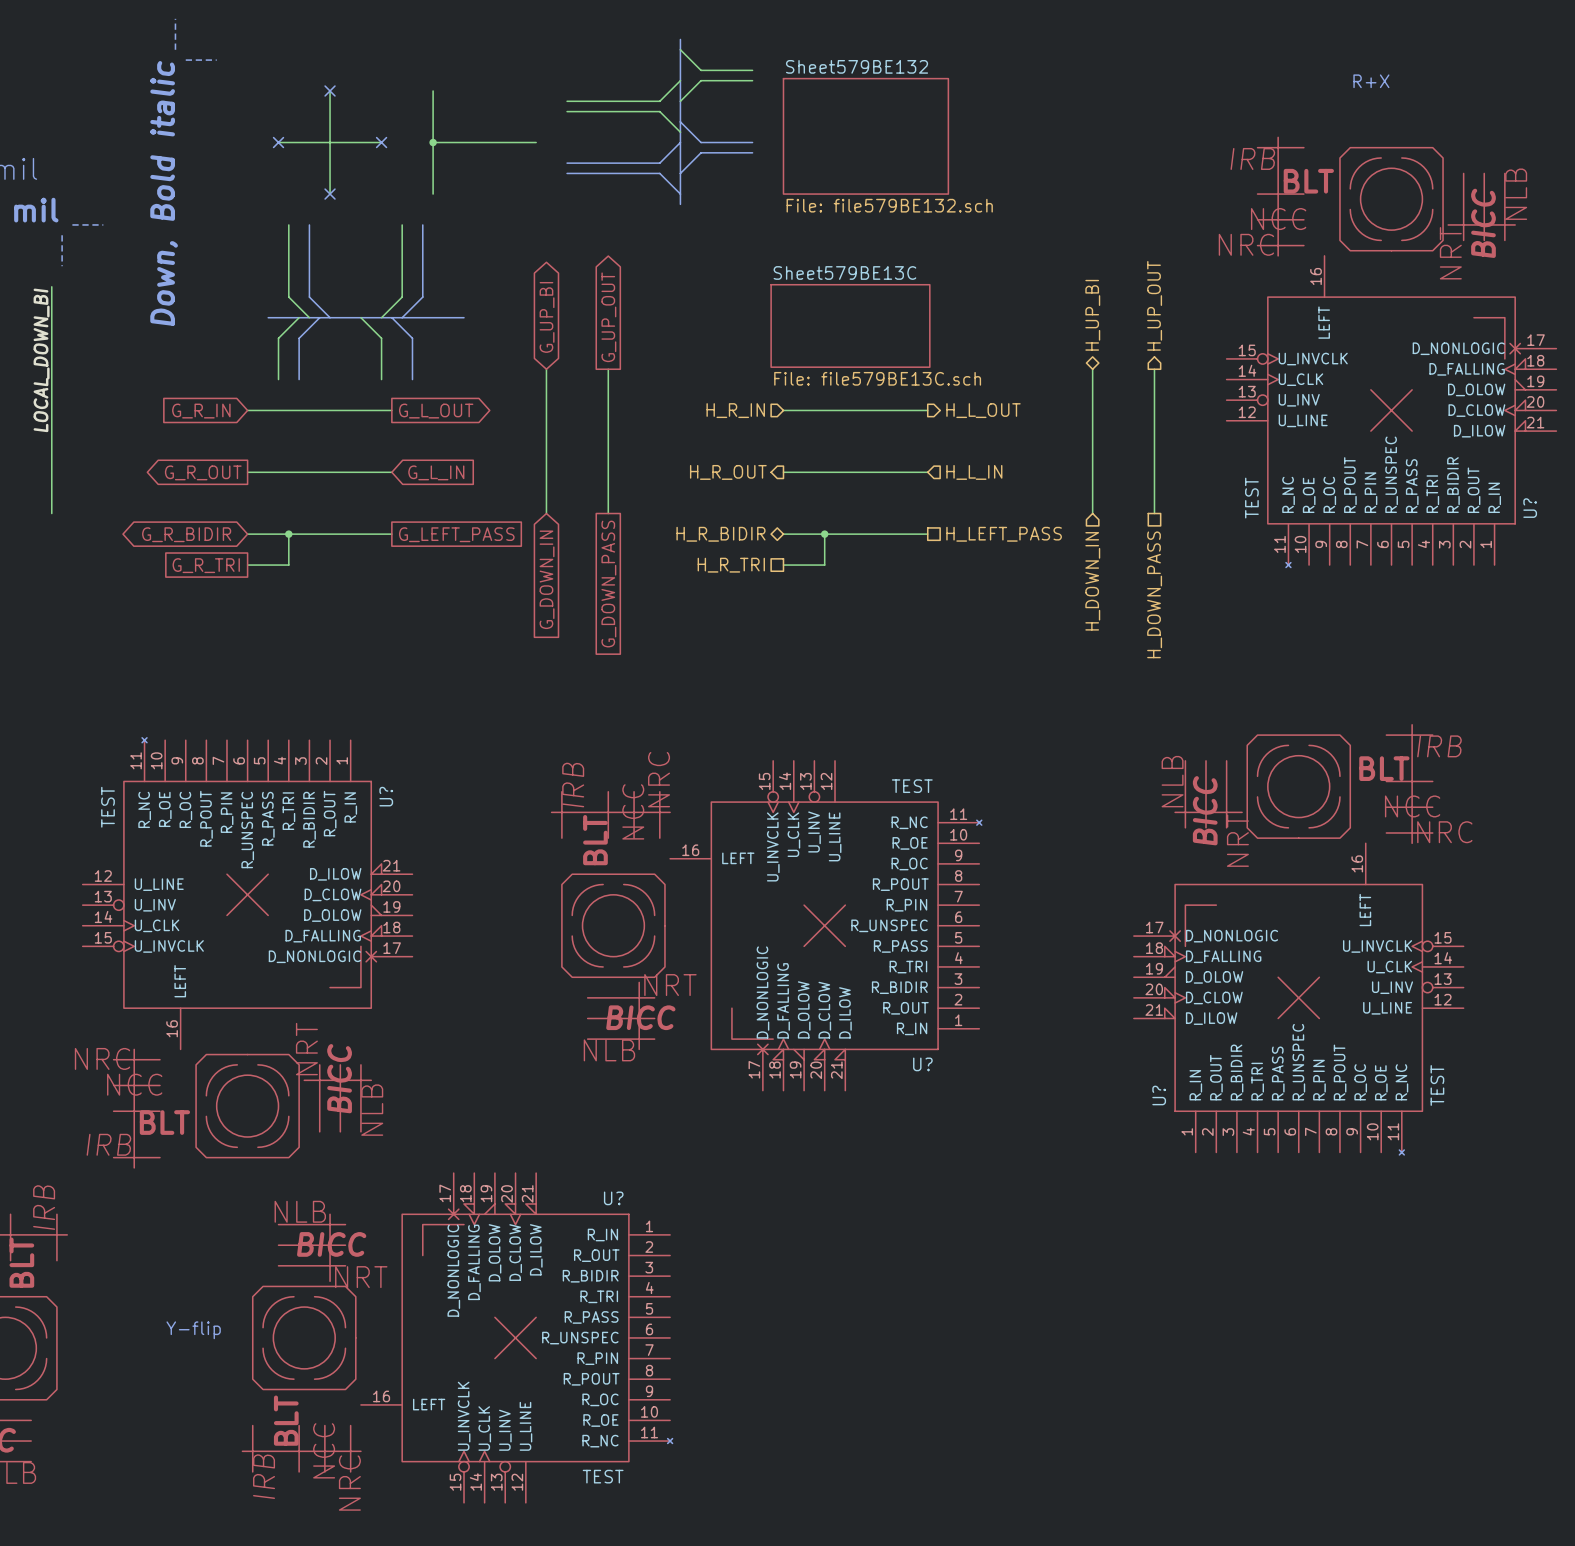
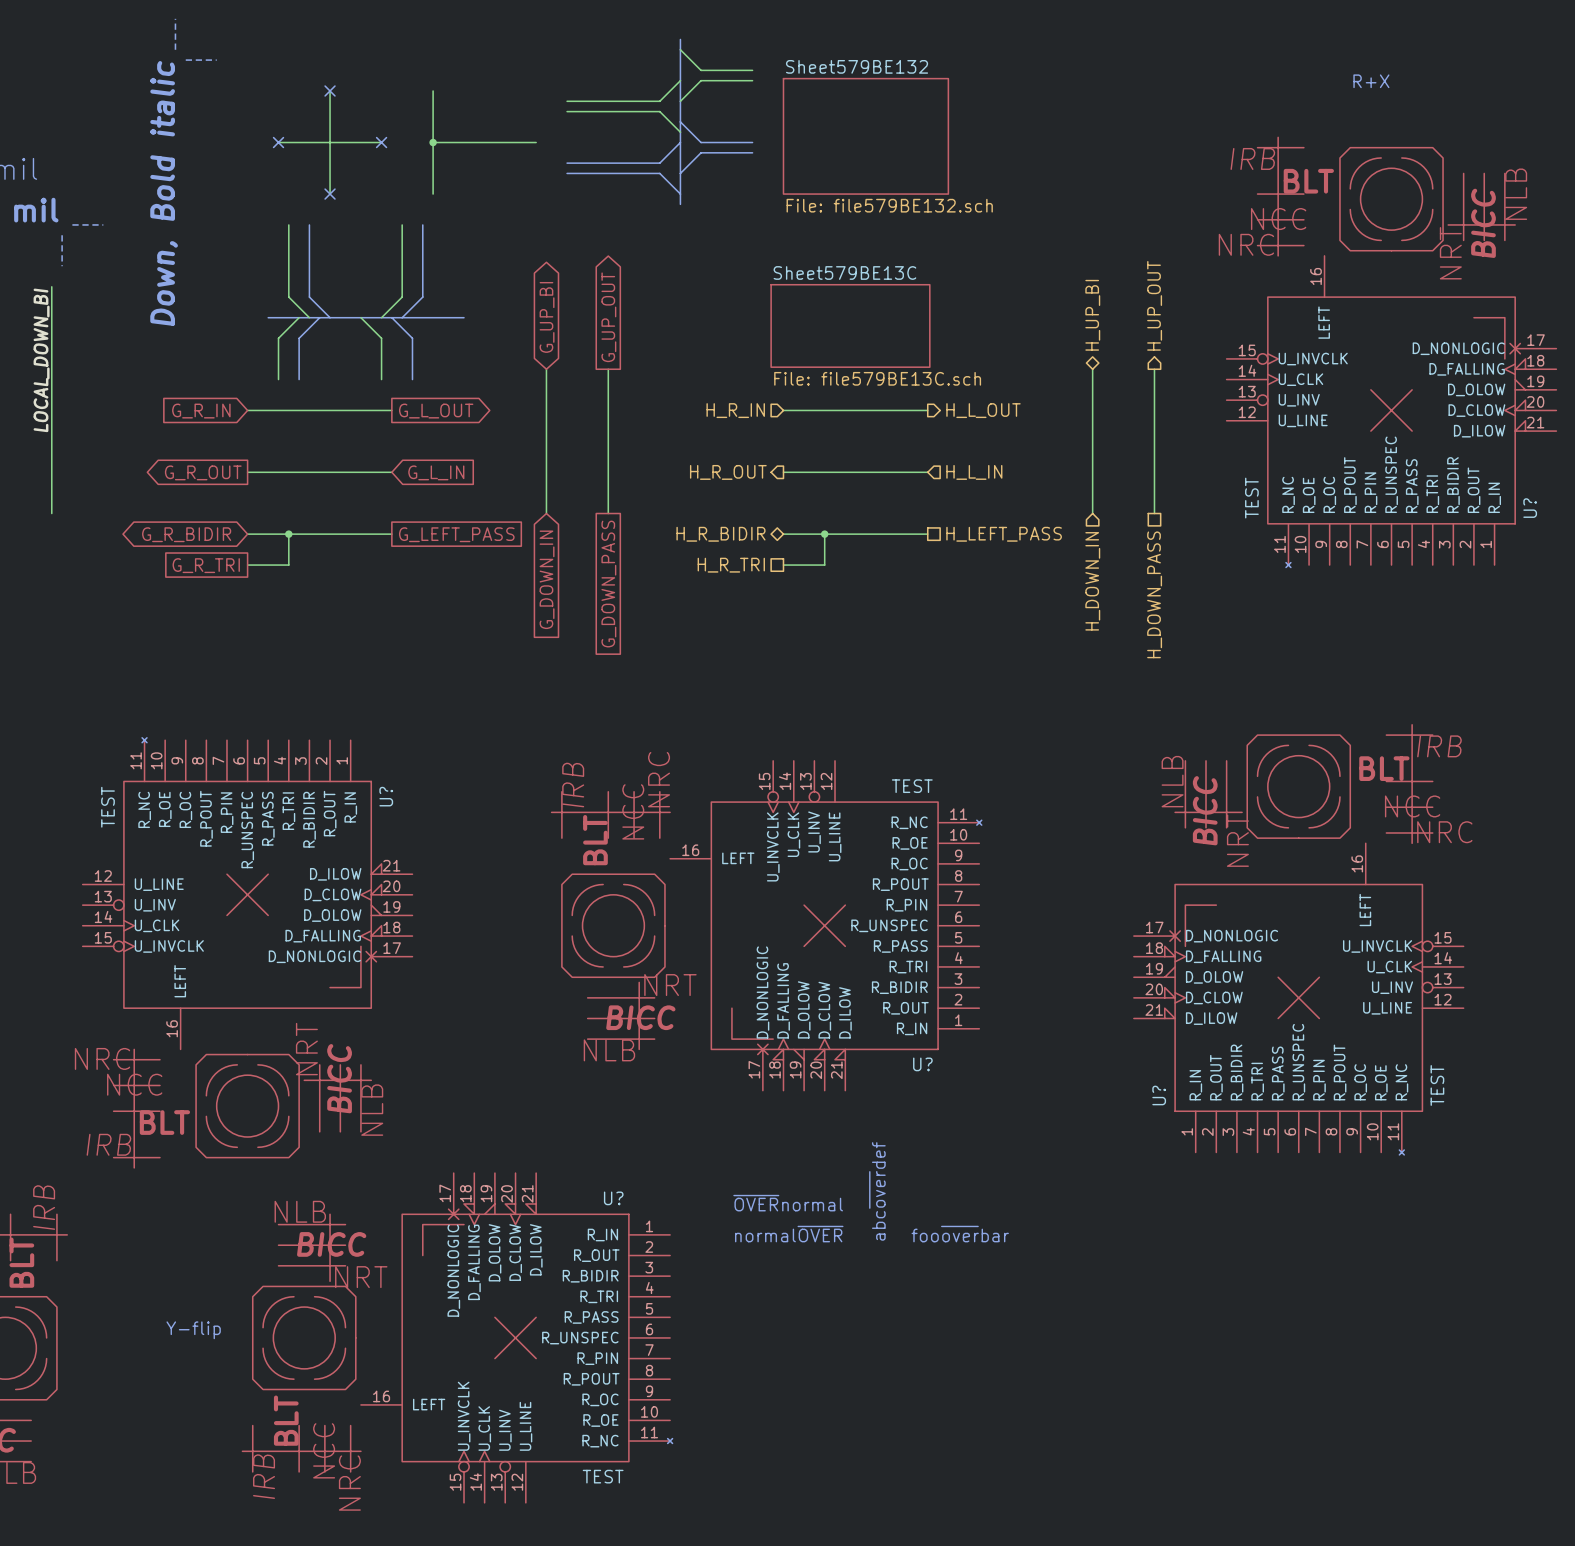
text: none -> abc~{over}def (877, 1191)
text: none -> ~{OVER}normal (788, 1203)
text: none -> normal~{OVER} (789, 1234)
text: none -> foo~{over}bar (960, 1234)

